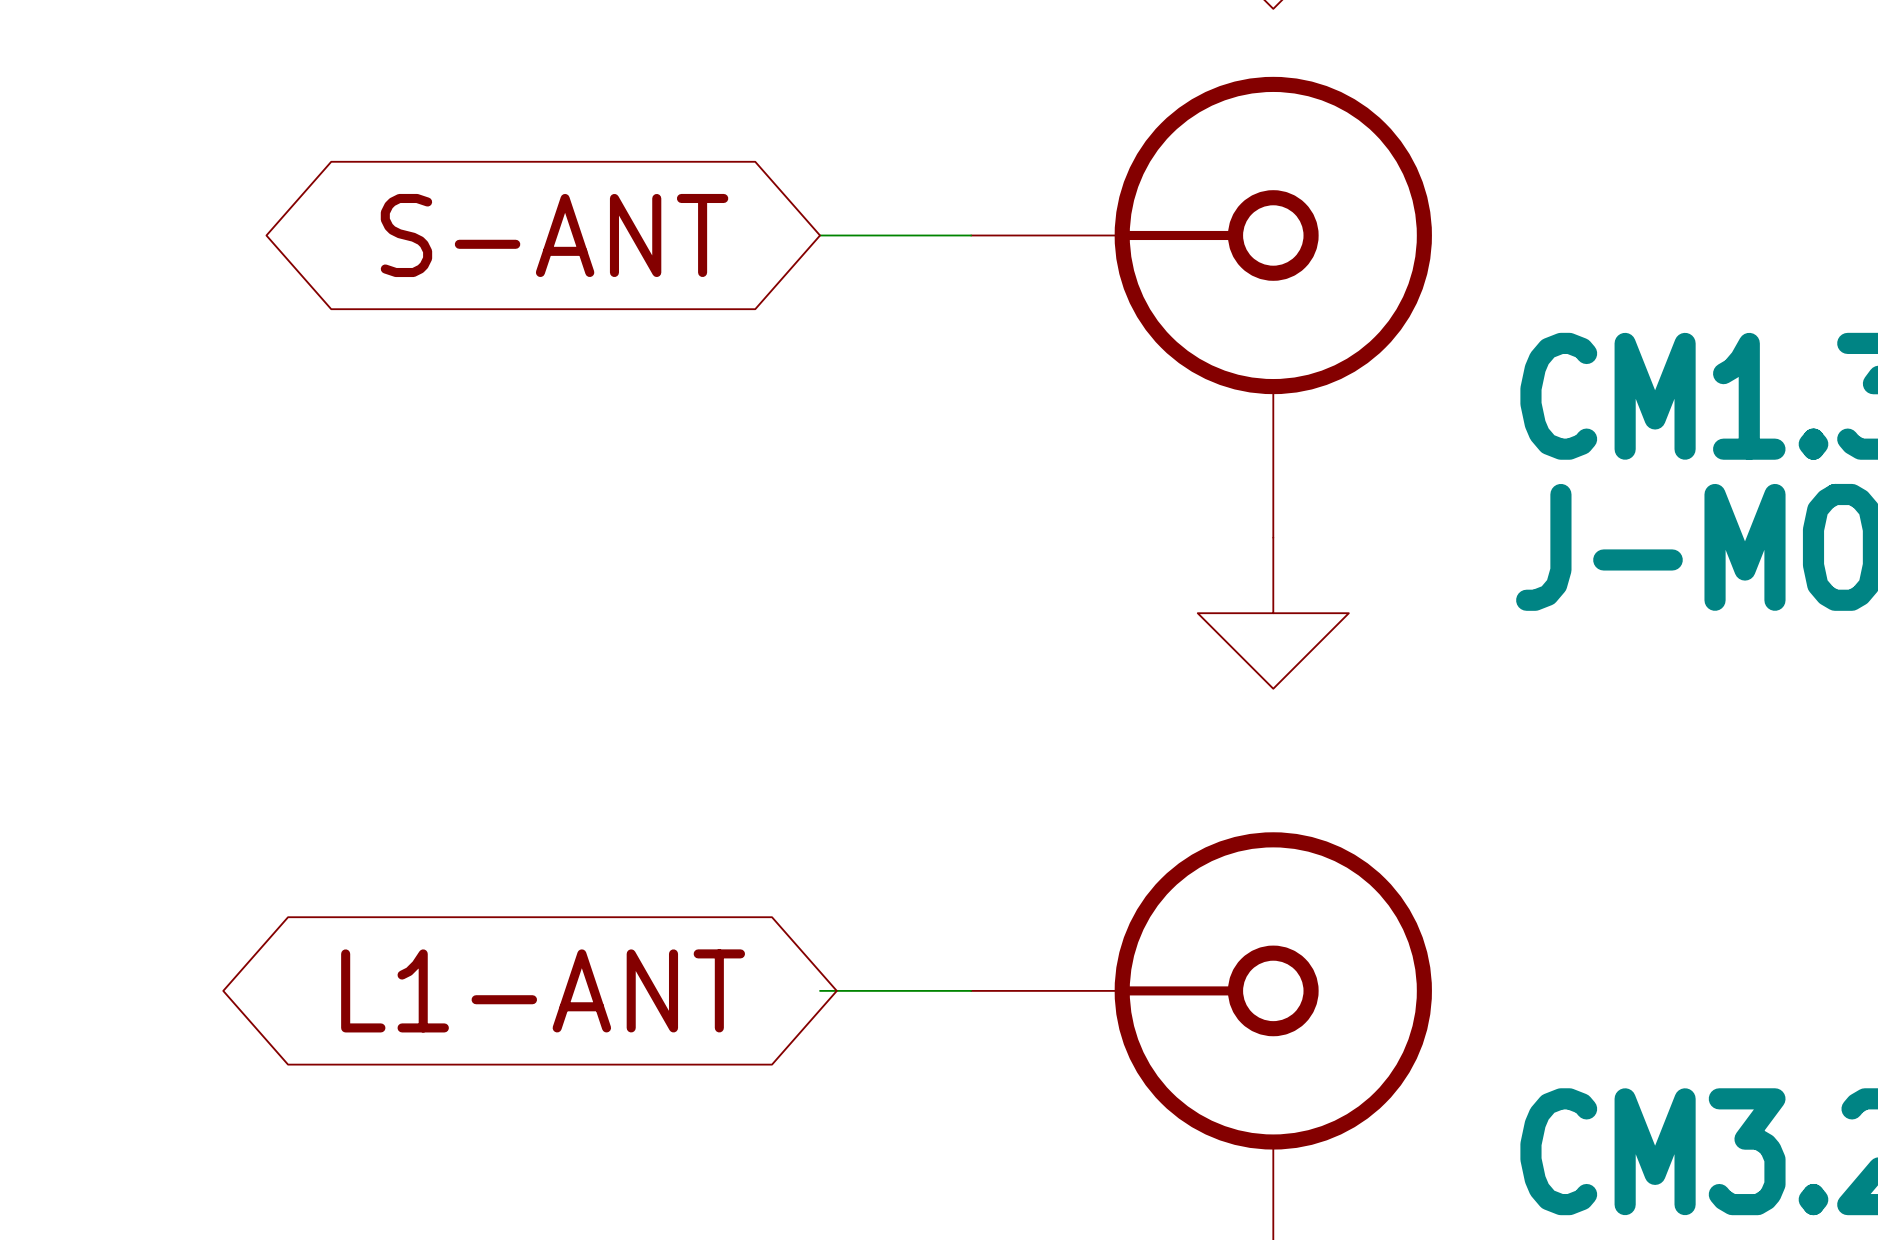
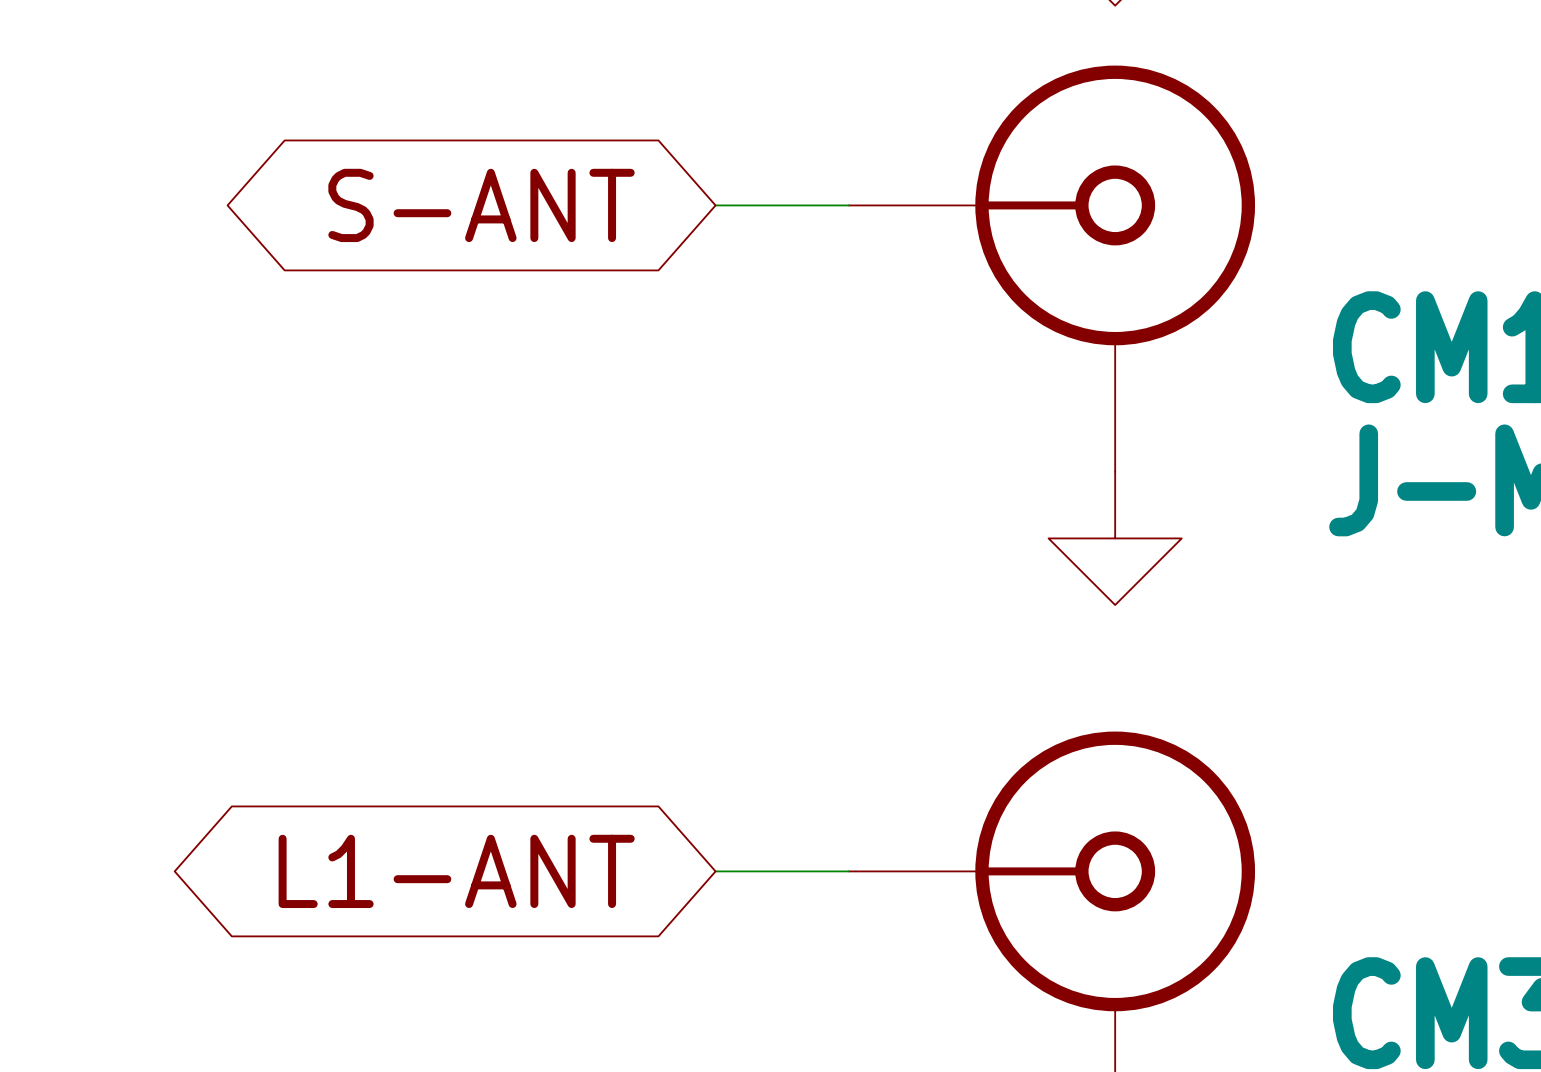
global label position: L1-ANT (543, 990) -> L1-ANT (456, 871)

